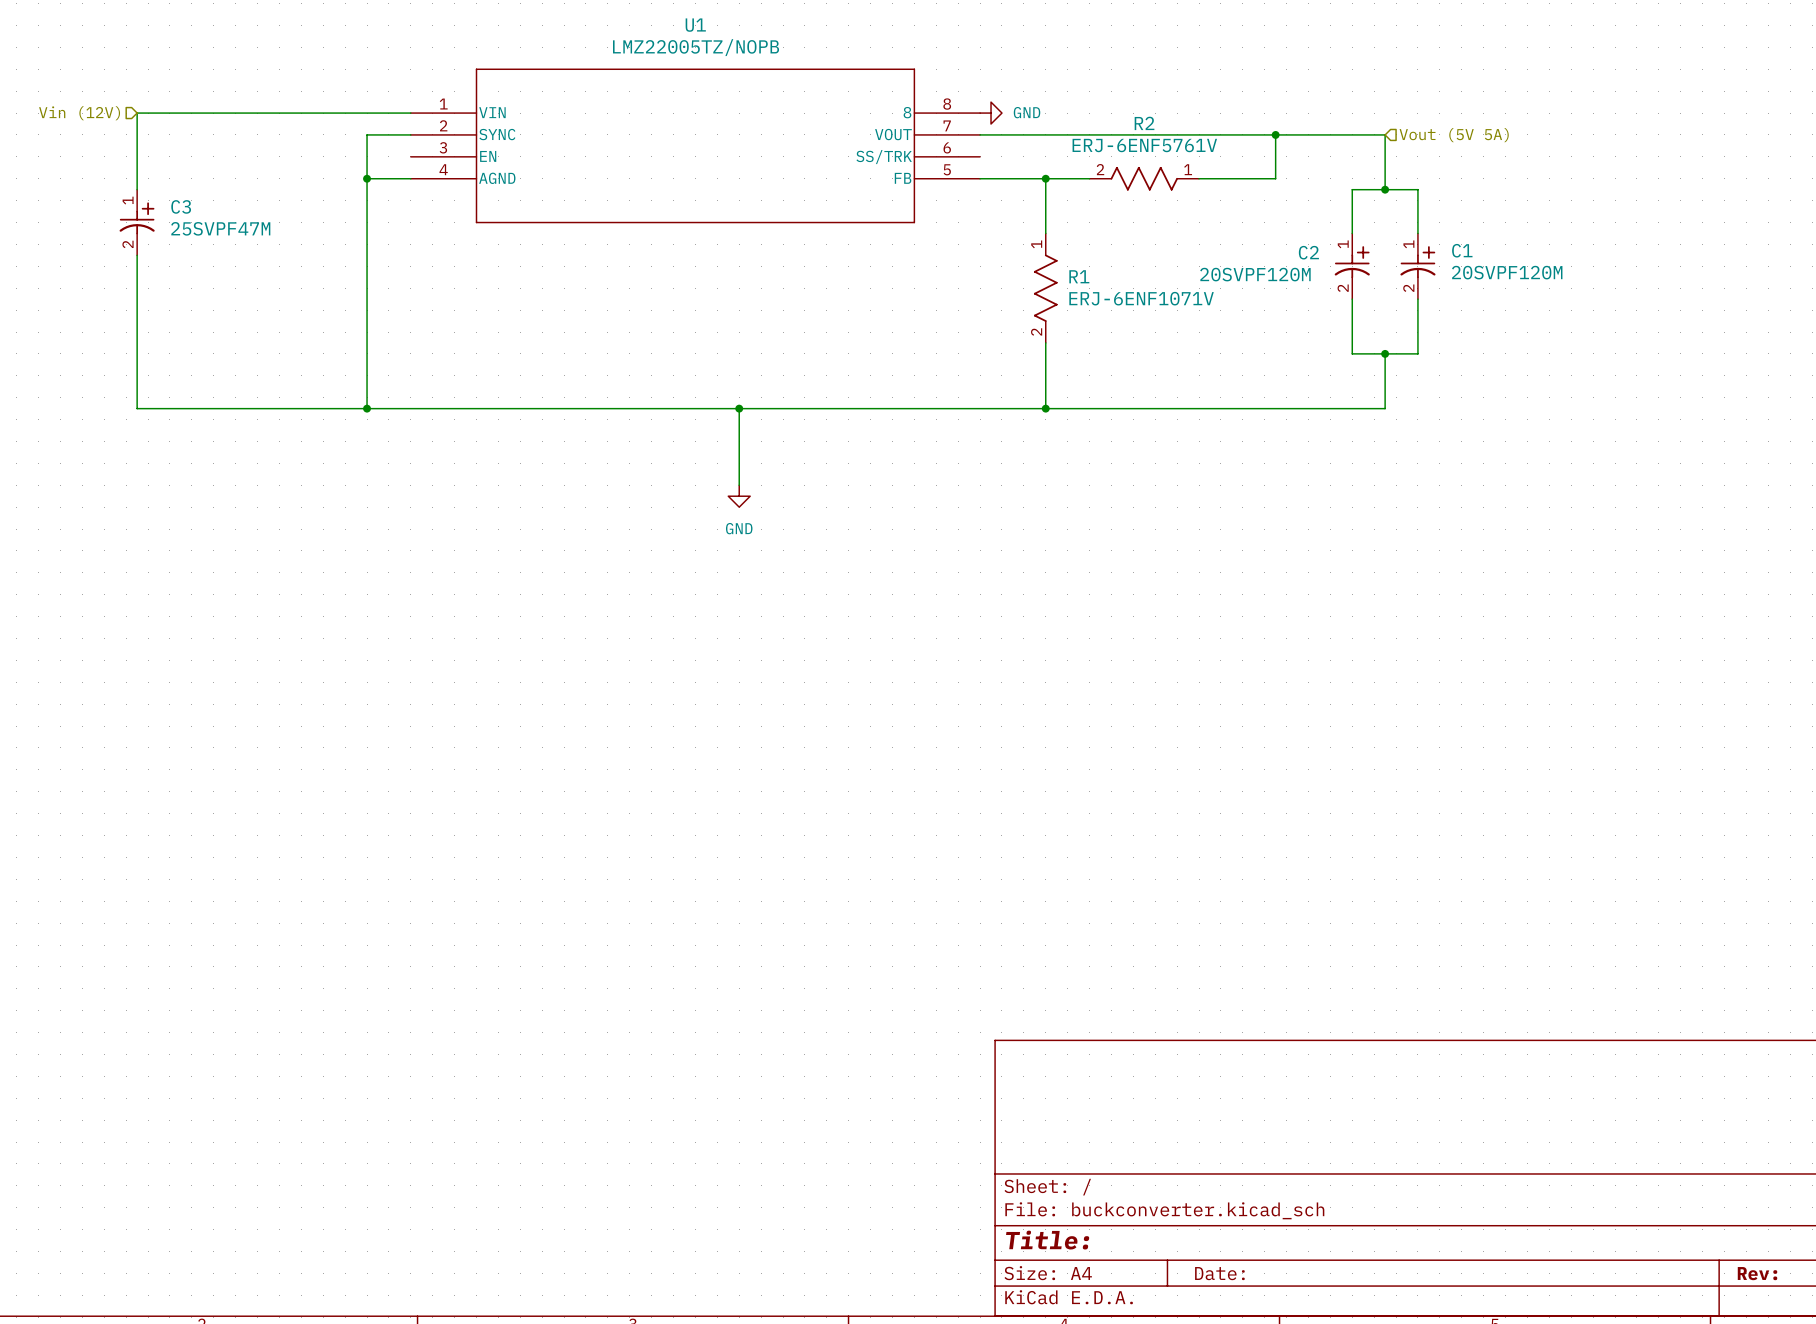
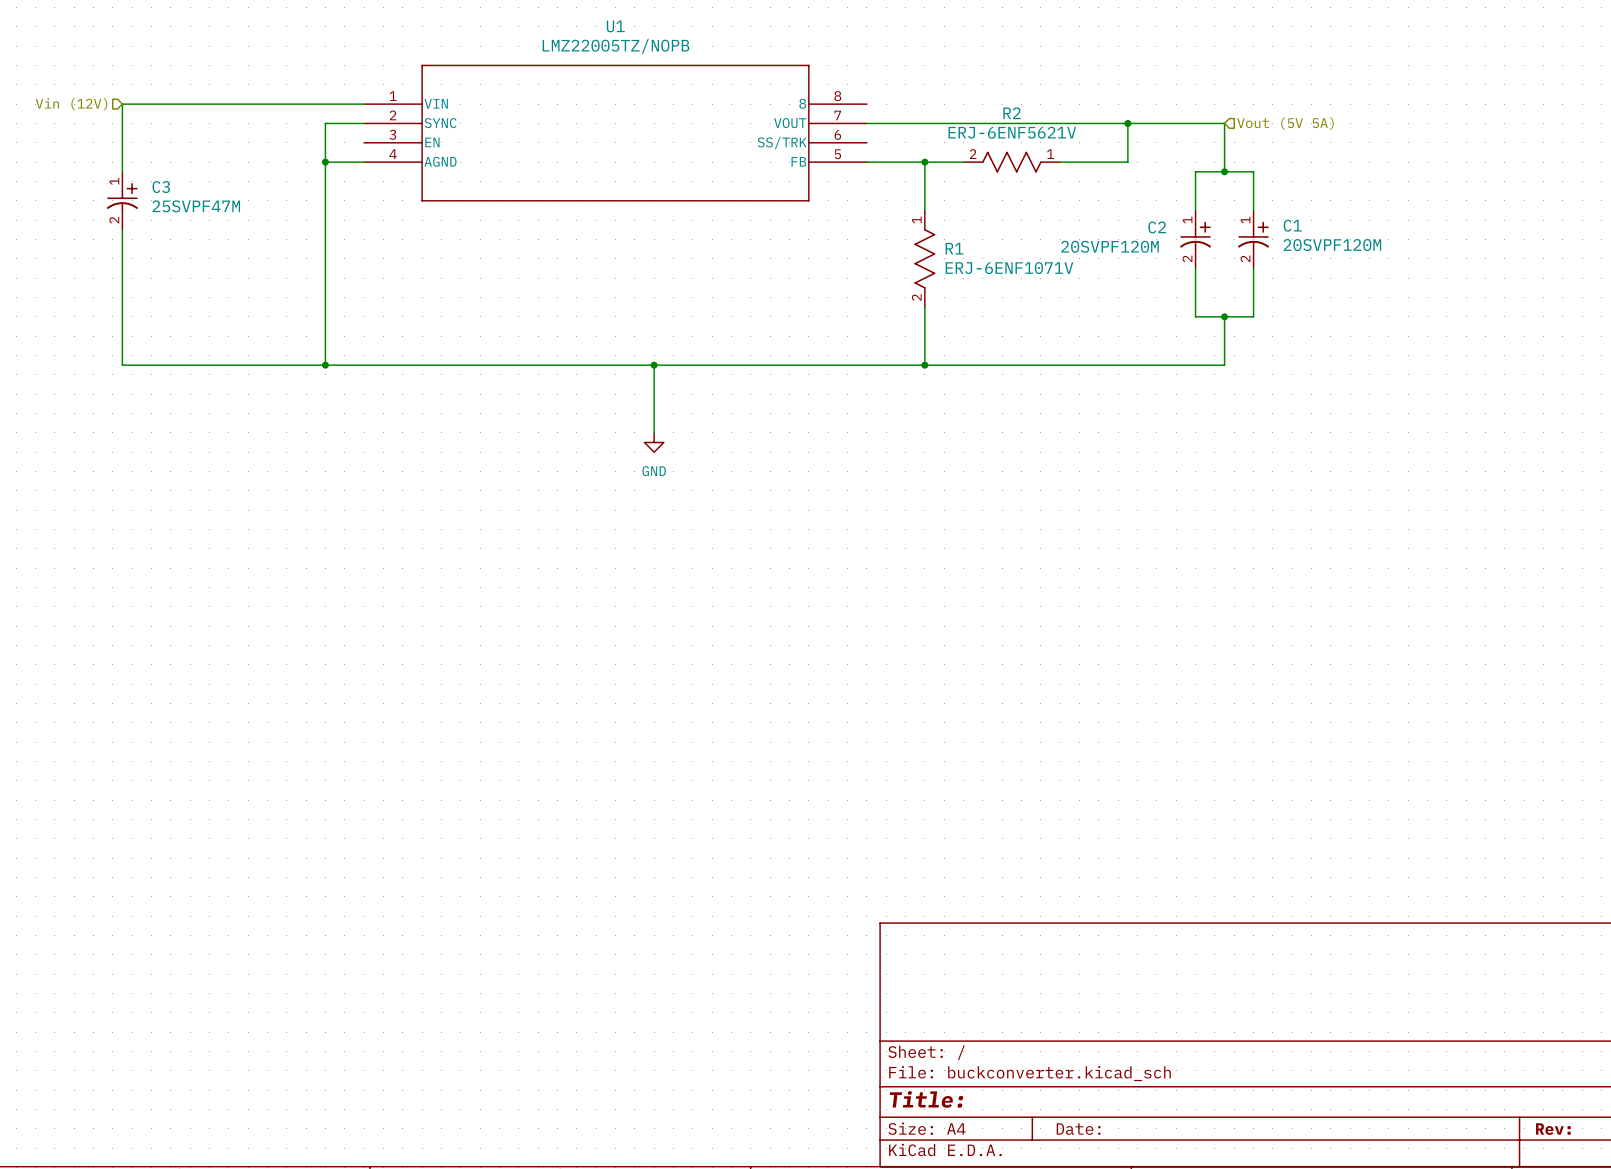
power symbol: GND (991, 113) -> none
R2 value: ERJ-6ENF5761V (1144, 145) -> ERJ-6ENF5621V (1012, 132)

